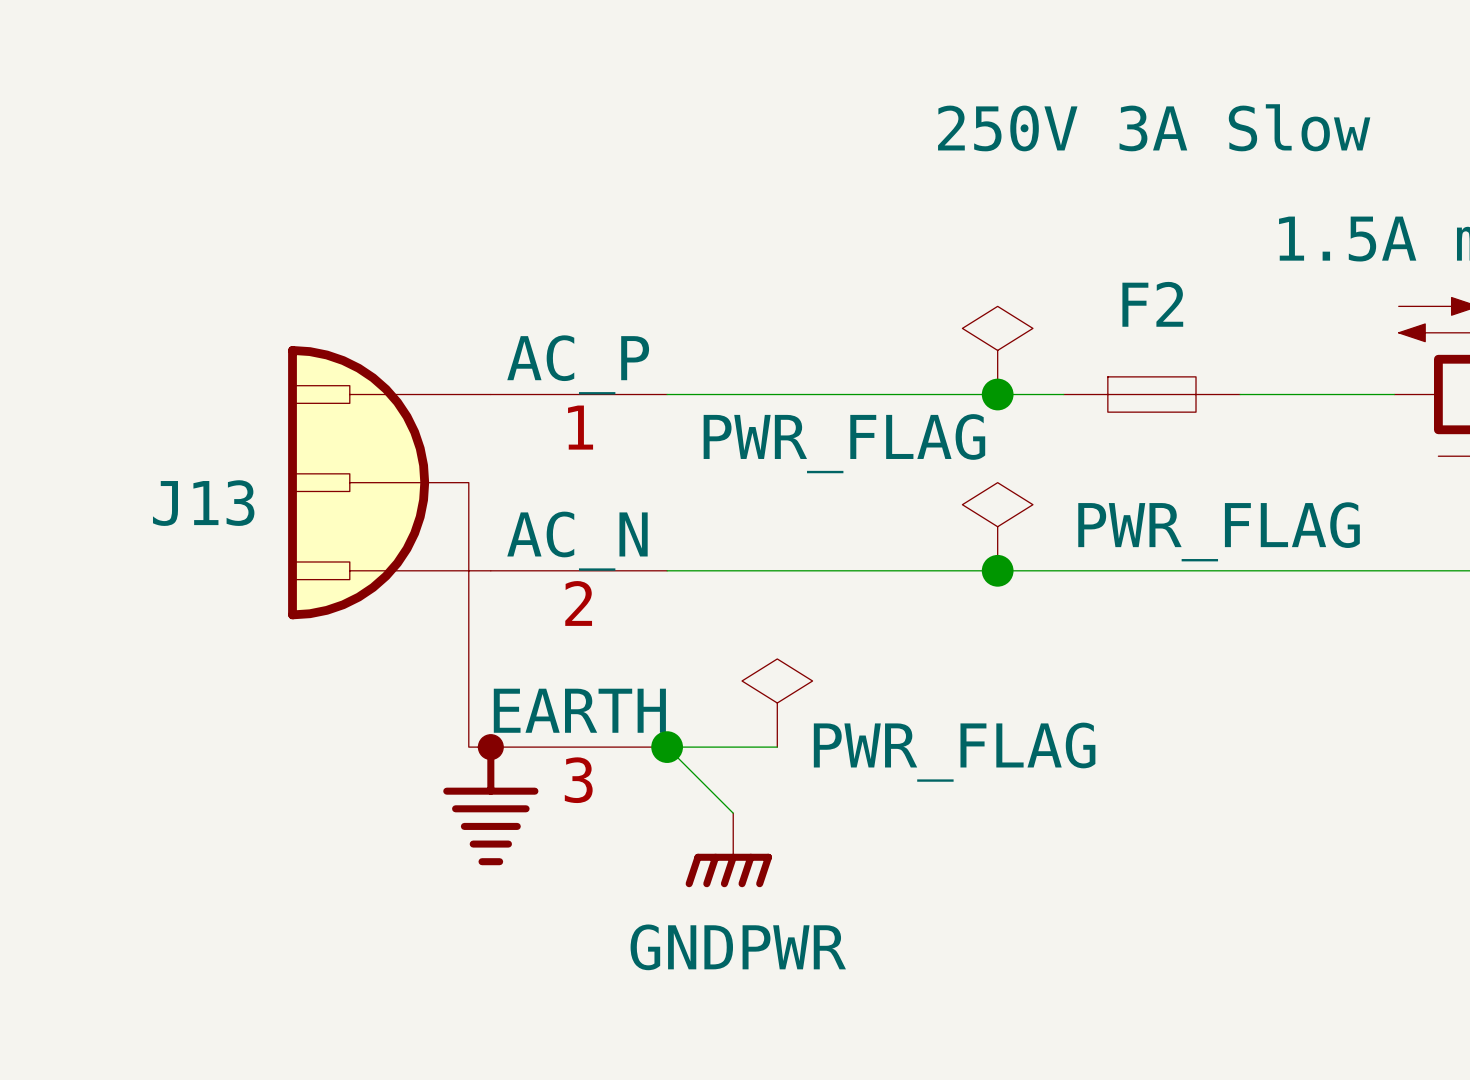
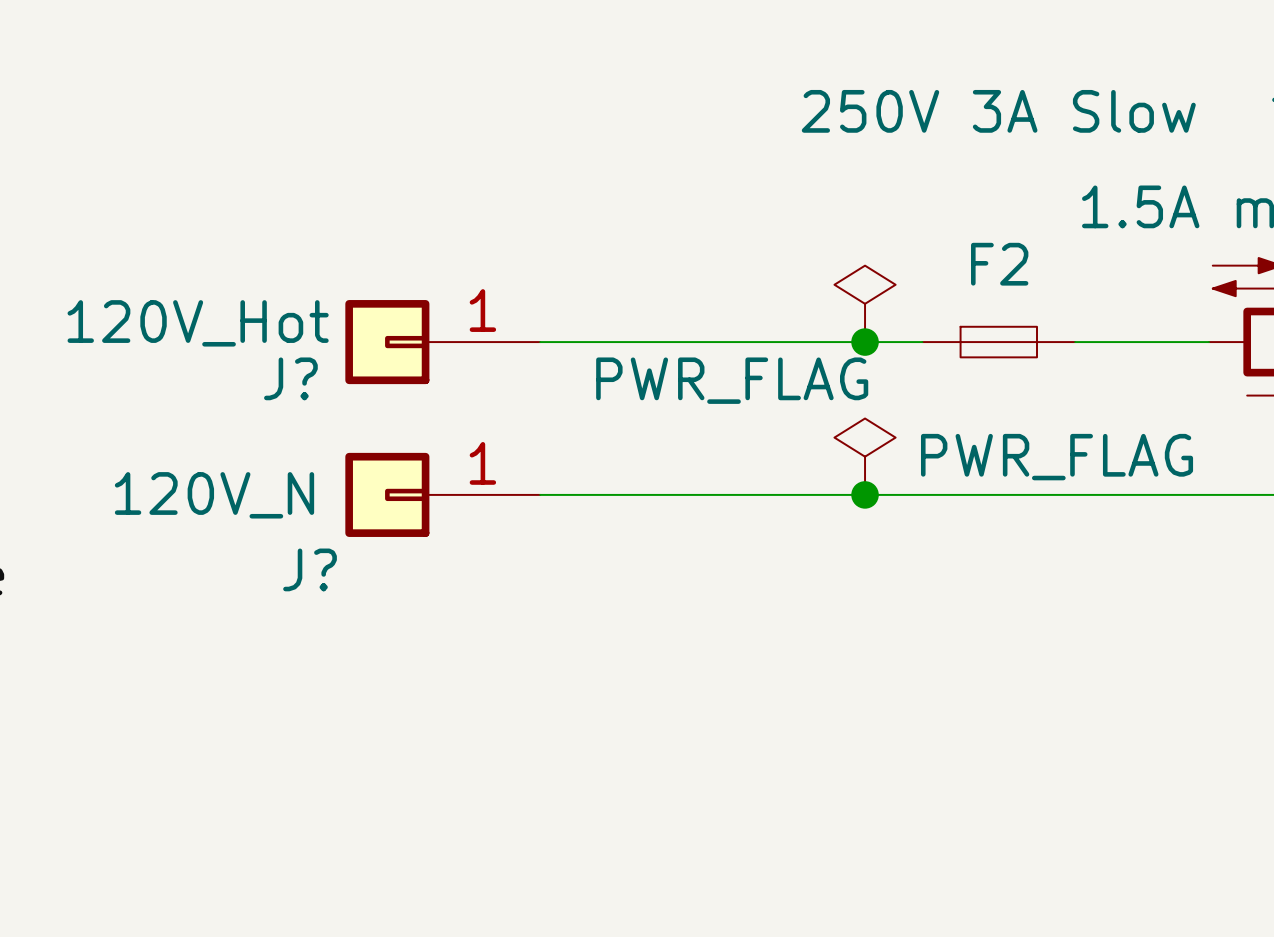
J?: none -> 120V_Hot (442, 342)
J?: none -> 120V_N (442, 494)
J13: (477, 605) -> none
power symbol: PWR_FLAG (777, 703) -> none
junction: (667, 747) -> none
wire: (777, 747) (667, 747) (733, 813) -> none
power symbol: GNDPWR (728, 850) -> none

